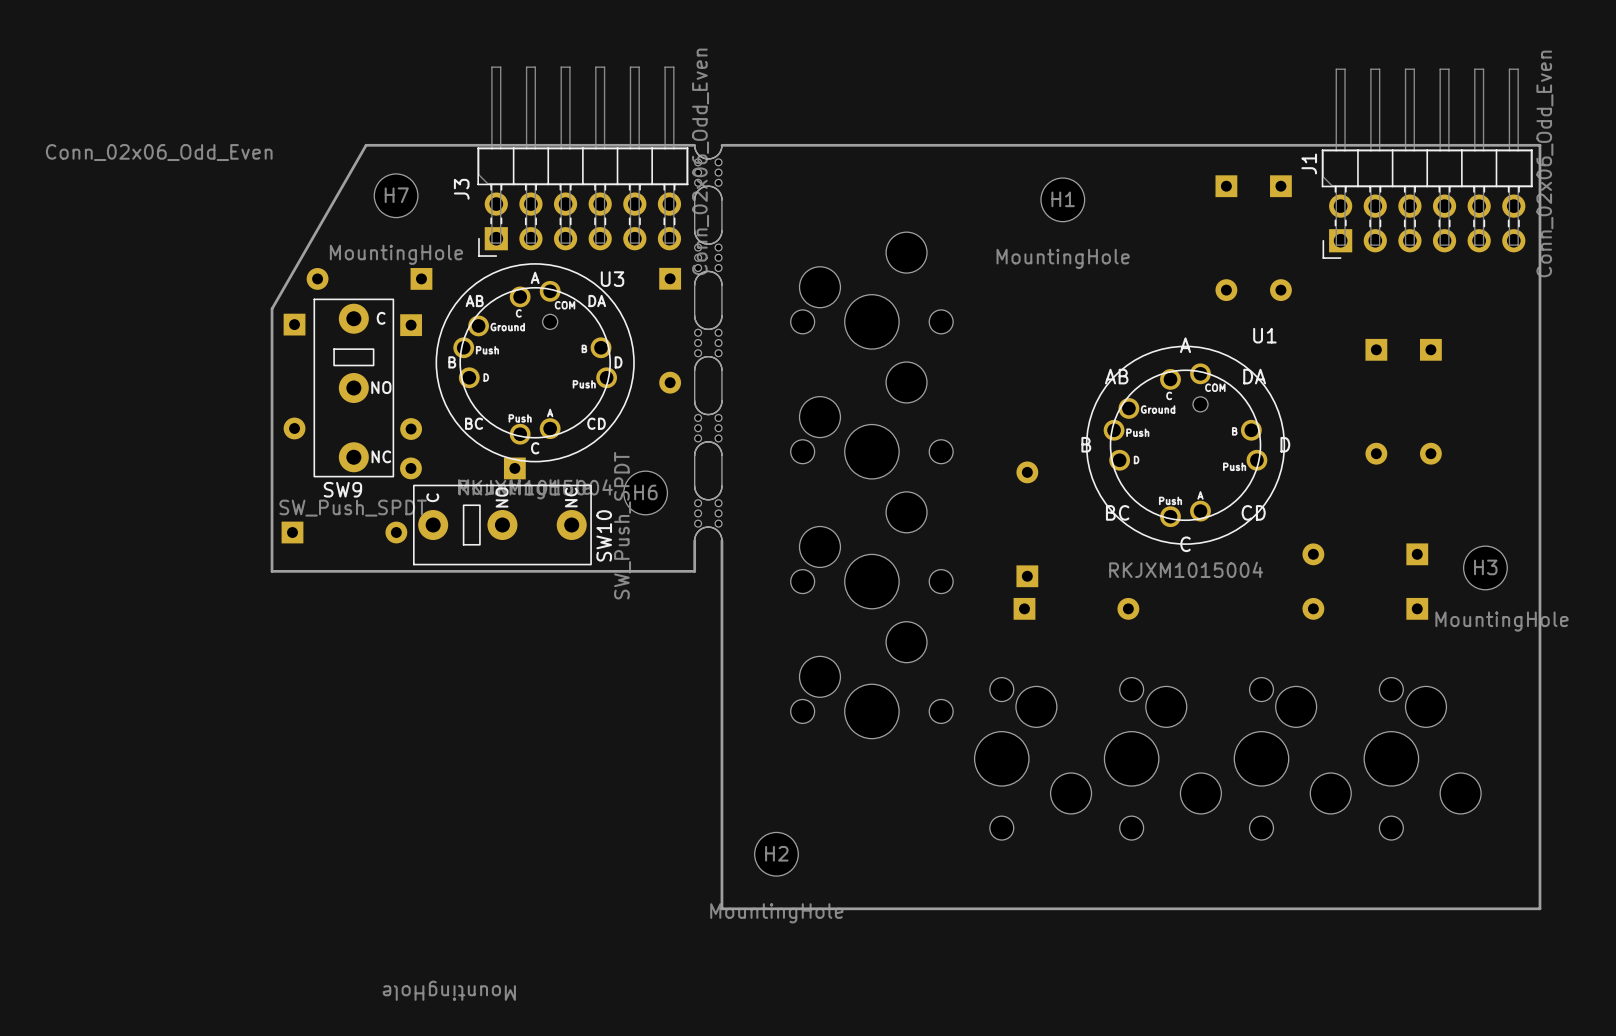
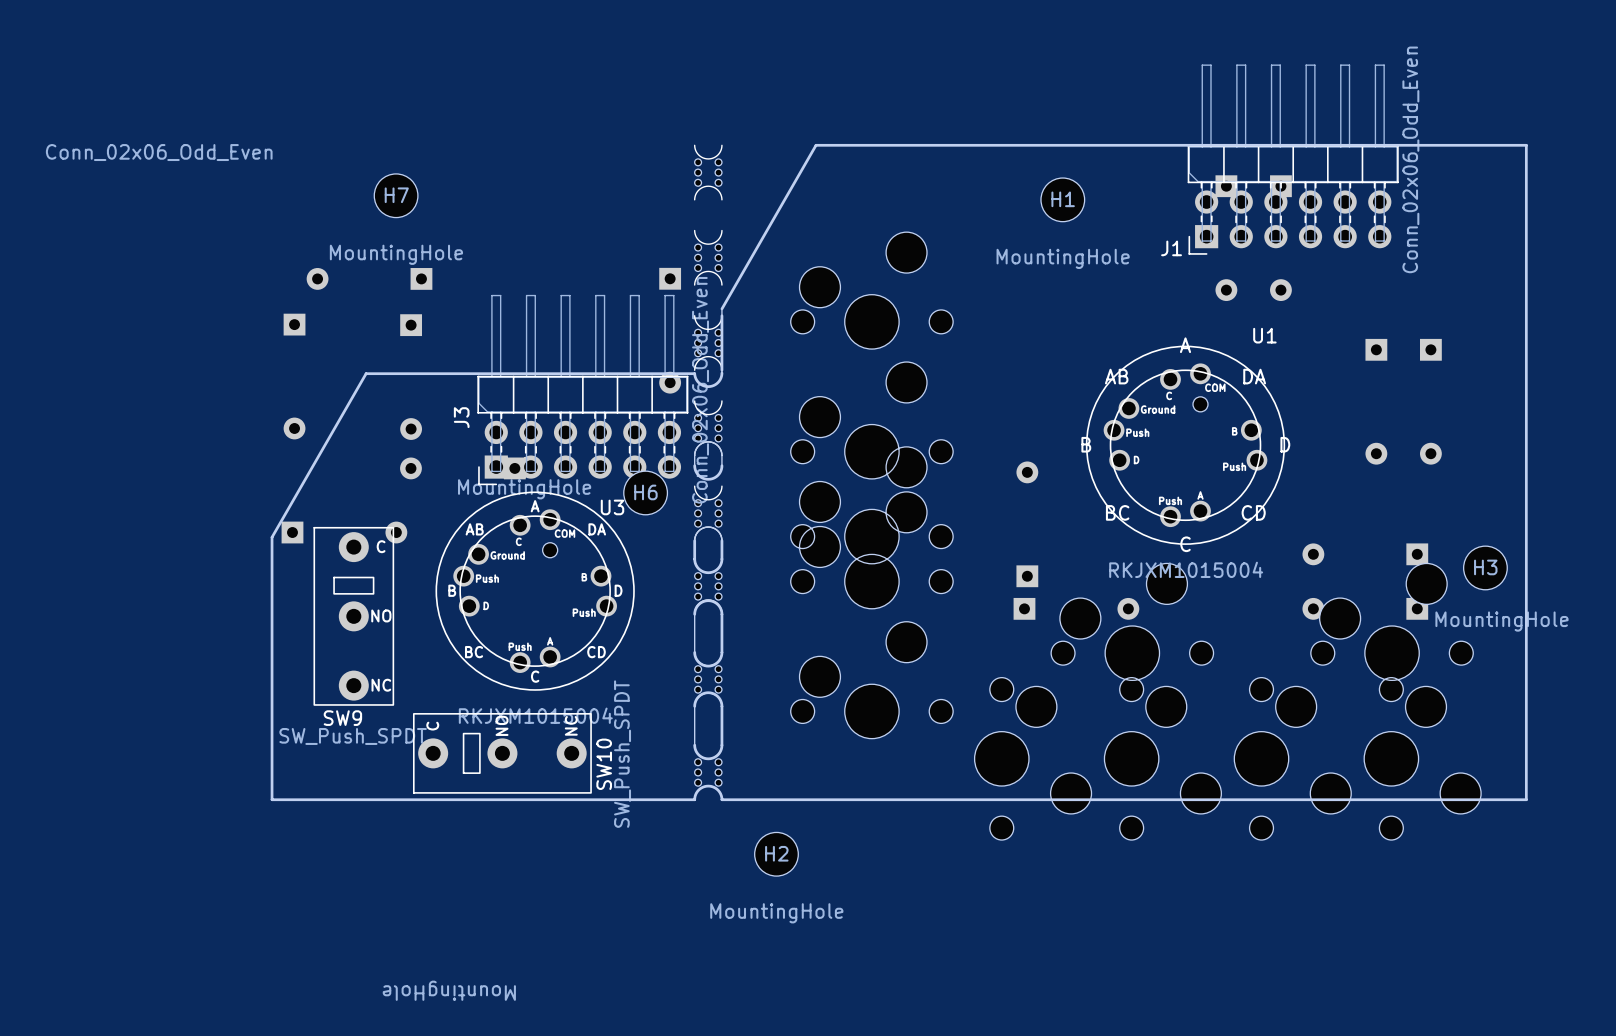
board edge: (816, 145) (721, 145) (717, 154) (708, 158) (698, 154) (694, 145) (366, 145) (272, 308) (272, 537) -> (721, 372) (718, 382) (708, 386) (699, 382) (694, 373) (366, 373) (272, 537)
board edge: (1526, 145) (1539, 145) (1539, 908) (721, 908) (721, 745) -> (1526, 145) (1526, 799) (721, 799) (717, 790) (708, 786) (698, 790) (694, 799) (272, 799) (272, 571)
J3 position: (582, 161) -> (582, 390)
J1 name rotation: 0° (1309, 163) -> 90° clockwise (1171, 248)
J1 name position: J1 (1309, 163) -> J1 (1171, 248)
J1 position: (1427, 163) -> (1293, 159)
board edge: (694, 199) (695, 235) (703, 243) (713, 243) (719, 238) (721, 232) (720, 194) (715, 188) (704, 186) (697, 191) (694, 199) -> none
board edge: (721, 308) (720, 278) (711, 271) (701, 273) (694, 283) (695, 320) (701, 327) (711, 328) (719, 324) (721, 315) -> (721, 308) (816, 145)
U3 position: (535, 362) -> (535, 591)
board edge: (721, 370) (719, 361) (711, 357) (701, 358) (695, 365) (694, 402) (697, 409) (703, 413) (713, 413) (720, 406) (721, 372) -> (721, 370) (721, 315)
SW9 position: (353, 387) -> (353, 616)
board edge: (694, 465) (695, 491) (701, 497) (708, 499) (715, 497) (720, 491) (721, 465) -> (694, 465) (698, 475) (708, 479) (717, 475) (721, 465)
part: none -> (871, 505)
SW10 position: (502, 525) -> (502, 753)
board edge: (694, 559) (694, 571) (272, 571) -> none
board edge: (721, 559) (721, 614) -> (721, 559) (717, 568) (708, 572) (698, 568) (694, 559)
part: none -> (708, 586)
part: none -> (1132, 621)
part: none -> (1392, 621)
board edge: (721, 652) (721, 706) -> (721, 652) (717, 662) (708, 666) (698, 662) (694, 652) (694, 614) (697, 606) (703, 601) (711, 601) (719, 606) (721, 614)
part: none -> (708, 679)
board edge: none -> (721, 706) (717, 696) (708, 692) (698, 696) (694, 706) (694, 745) (697, 753) (704, 758) (713, 757) (719, 753) (721, 745)
part: none -> (708, 772)

